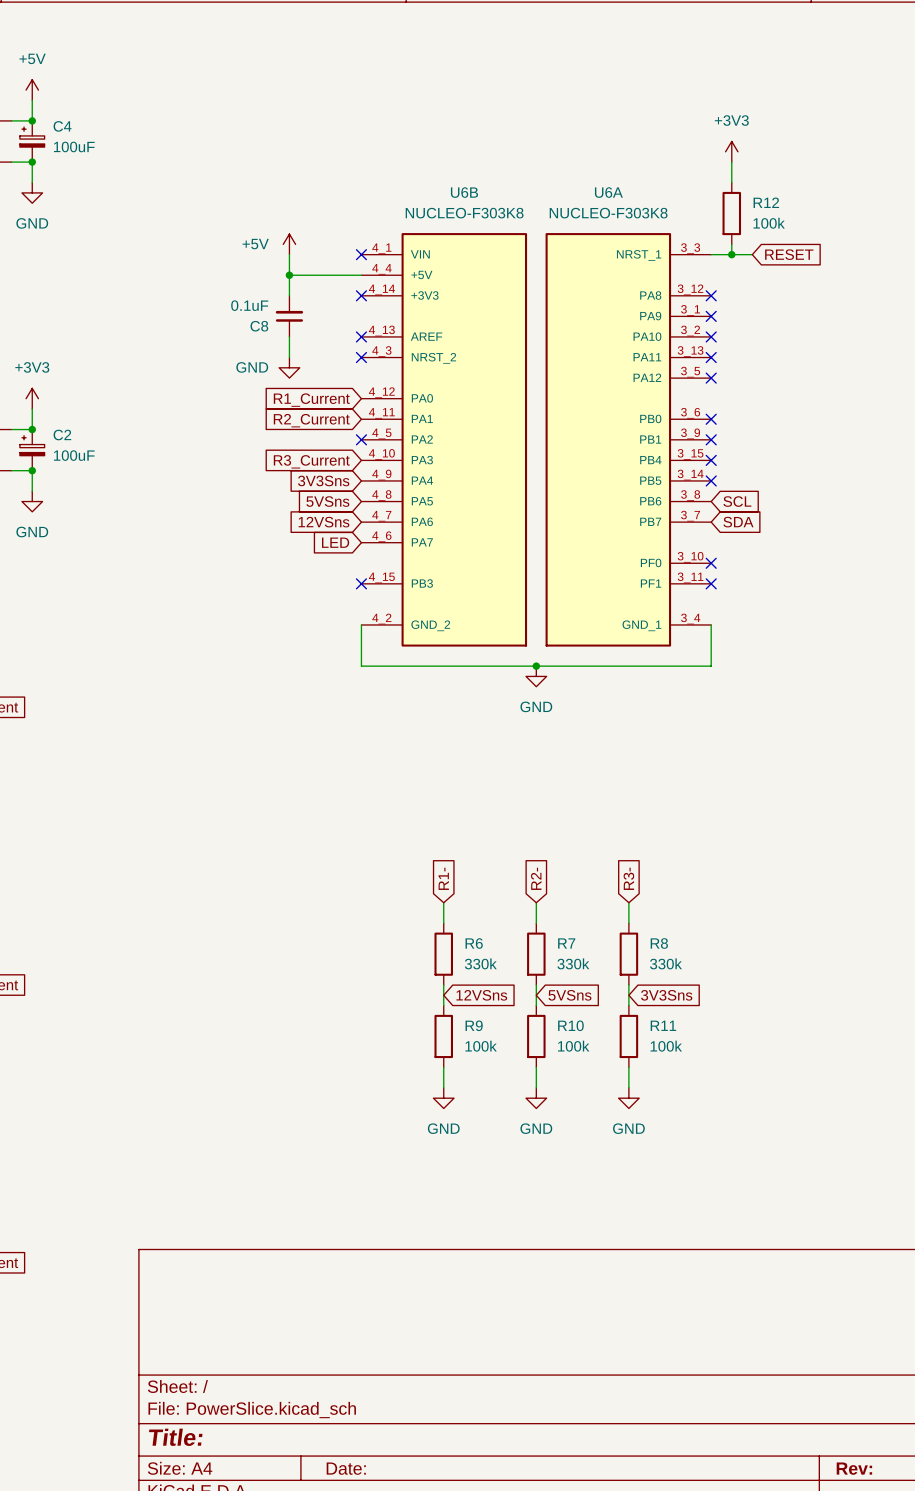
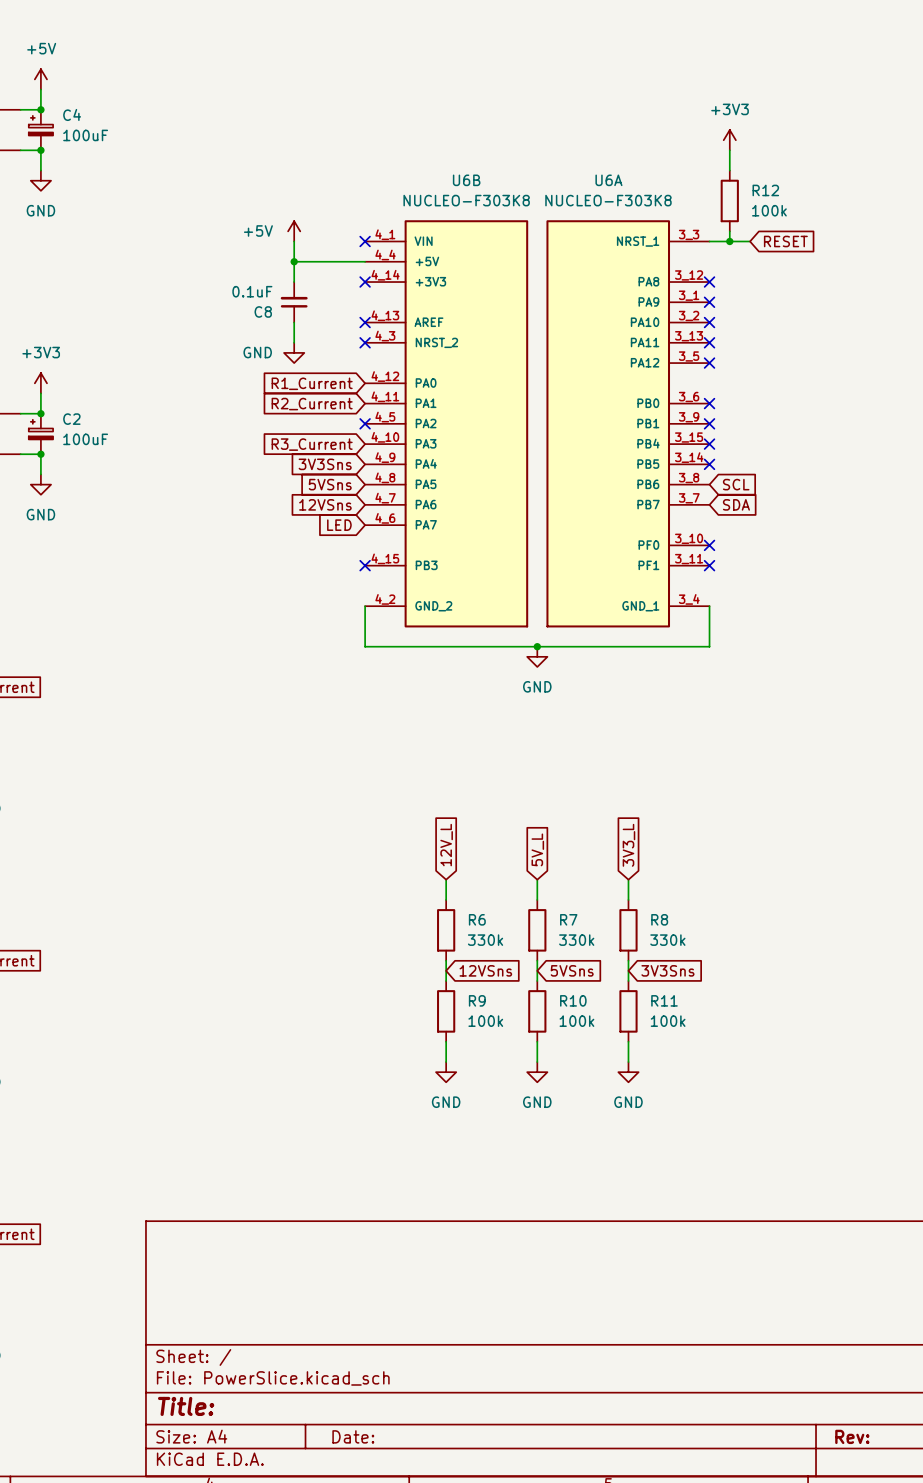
global label: R1- (443, 878) -> 12V_L (446, 845)
global label: R2- (536, 878) -> 5V_L (537, 849)
global label: R3- (628, 878) -> 3V3_L (628, 845)

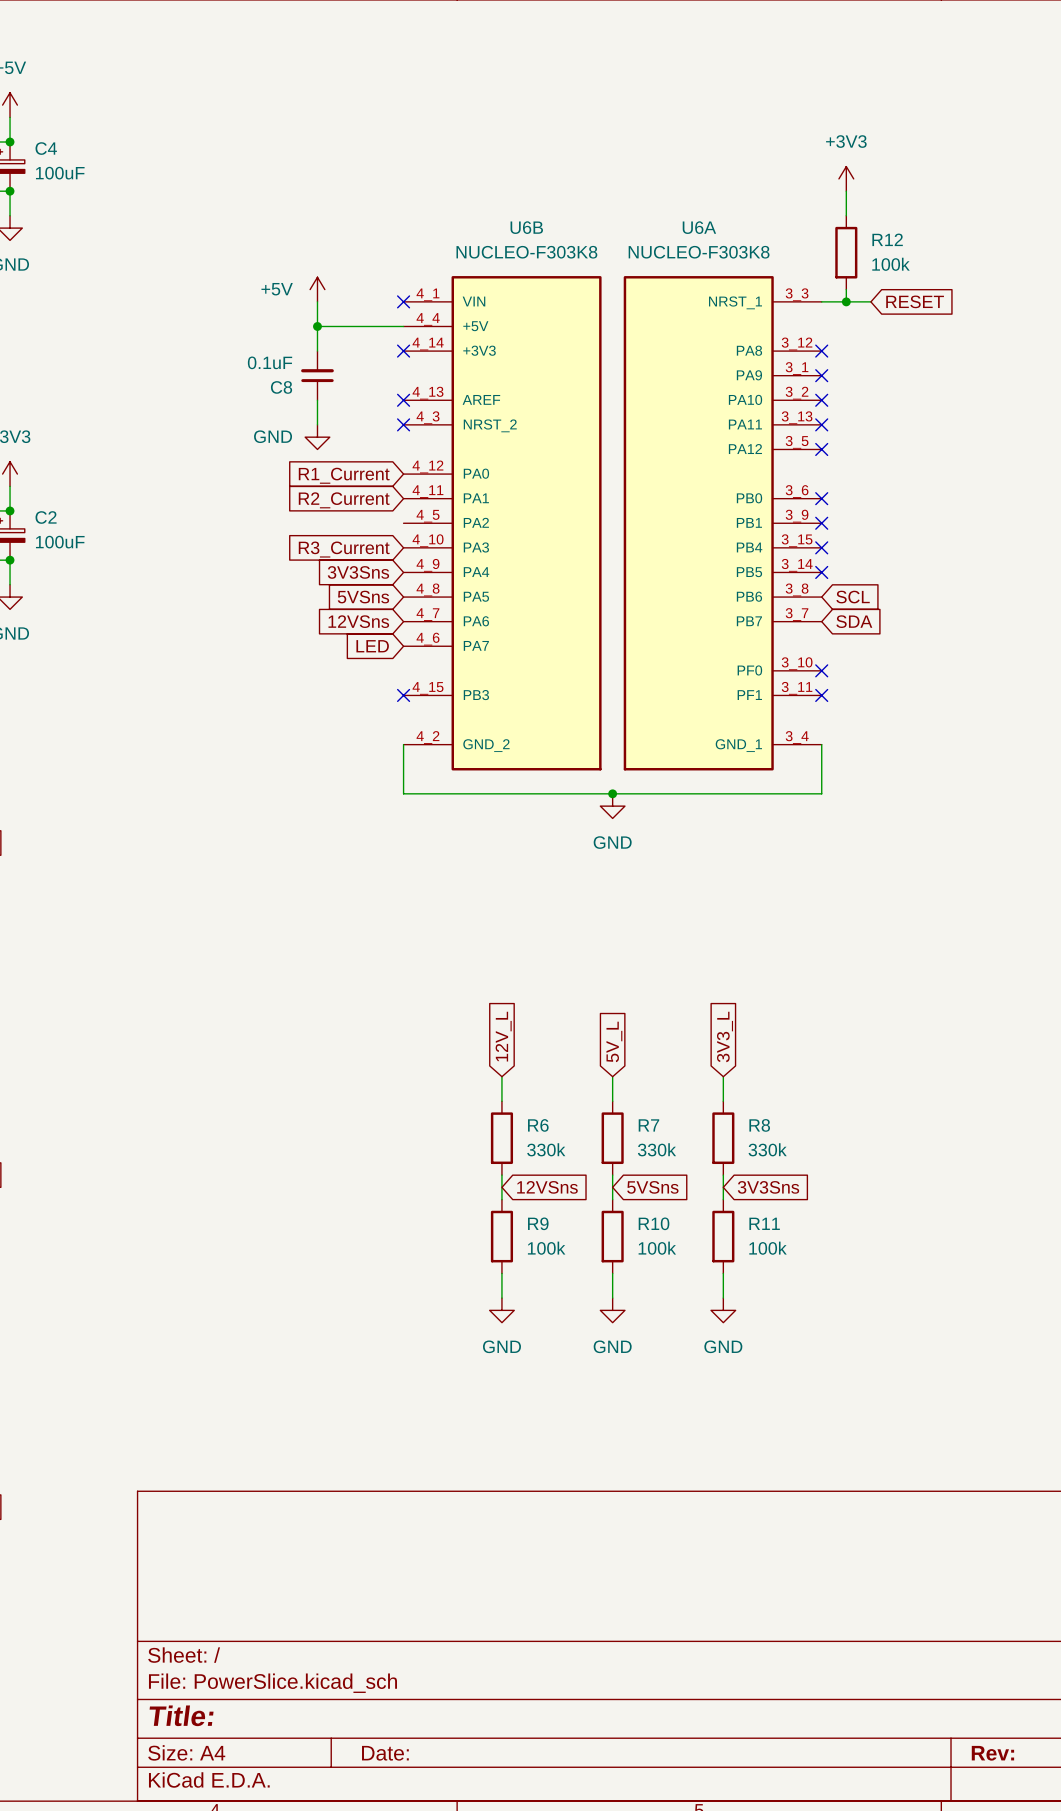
no-connect mark: (365, 423) -> none

